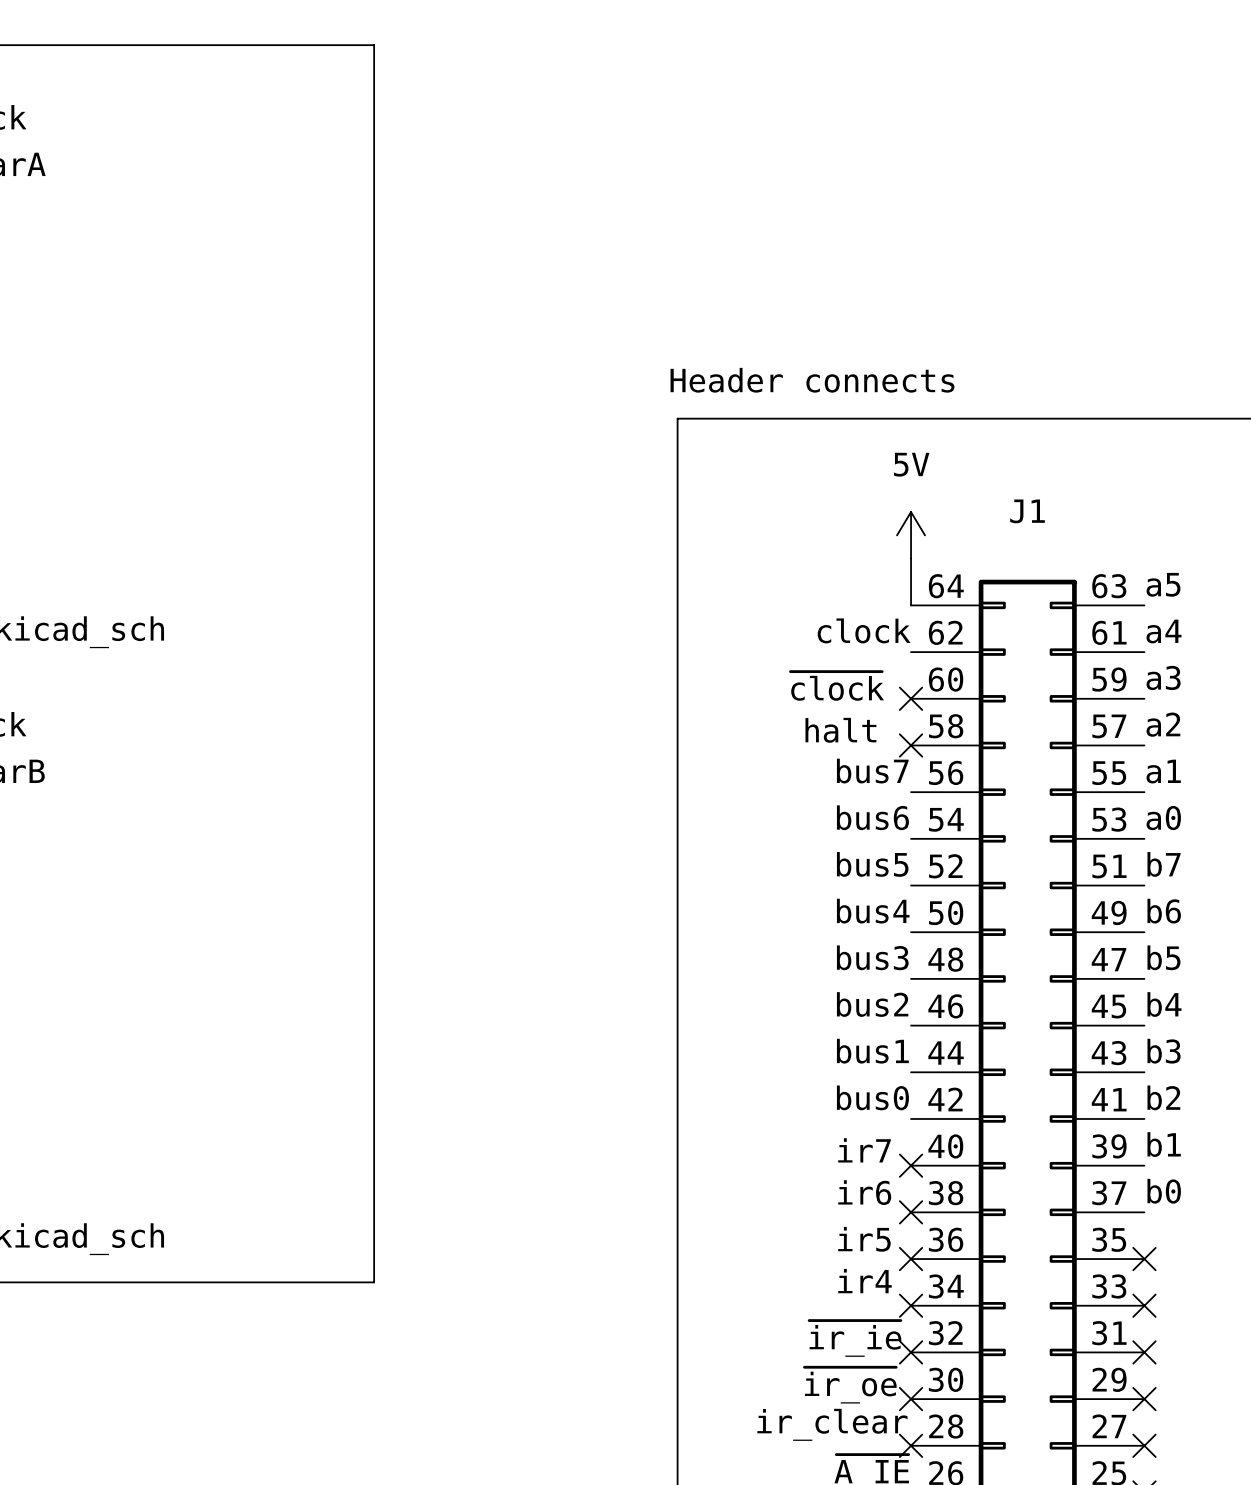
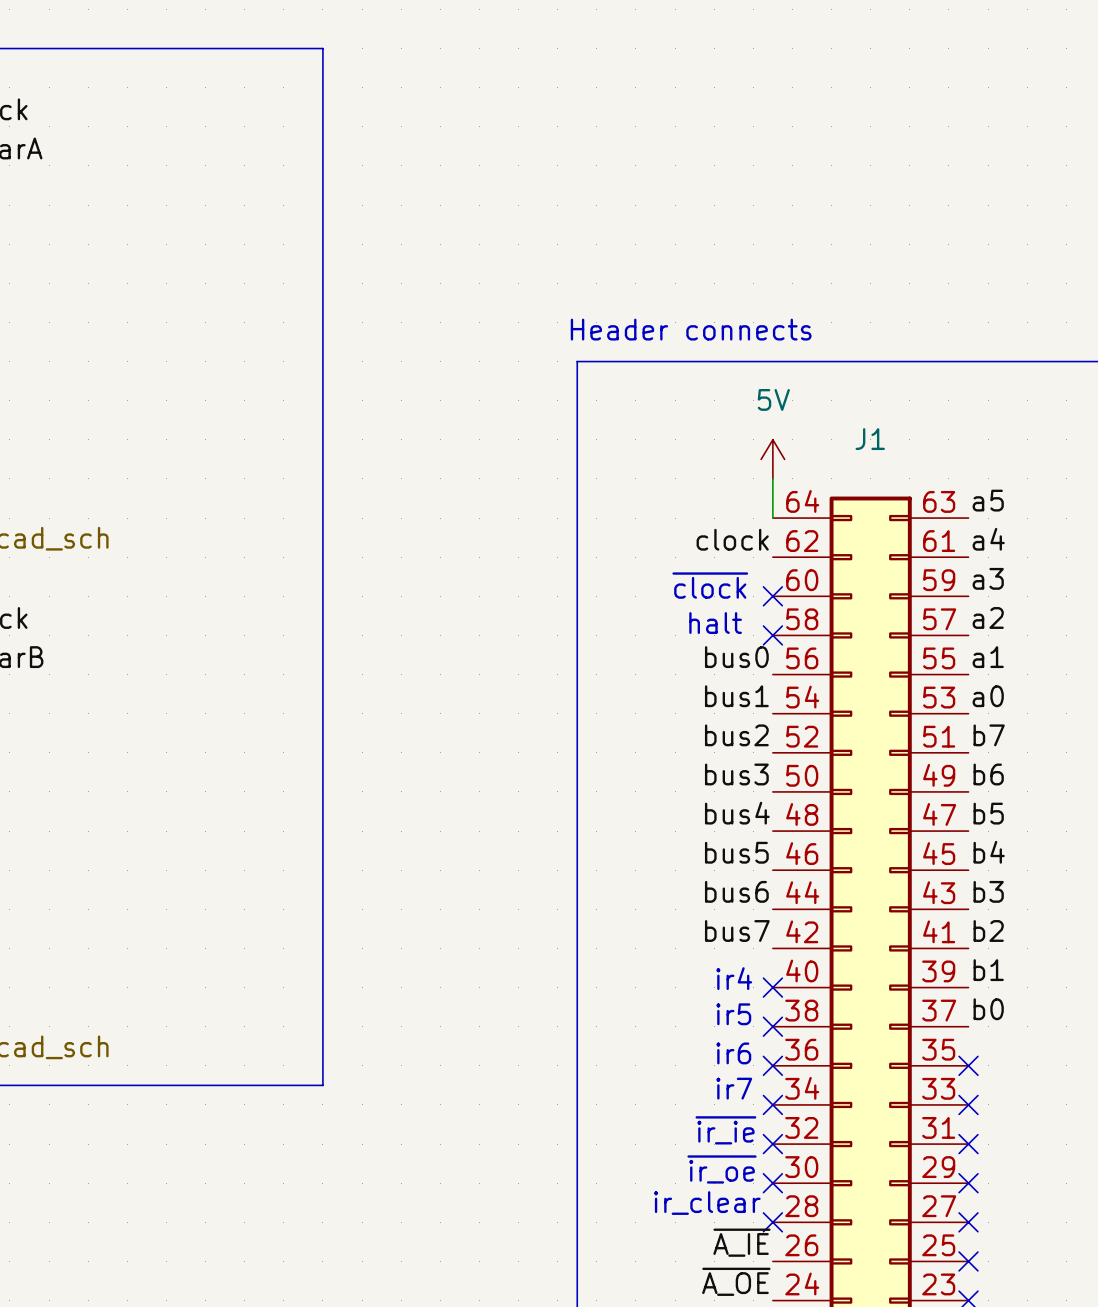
label: bus7 (872, 771) -> bus0 (736, 657)
label: bus6 (872, 817) -> bus1 (736, 696)
label: bus5 (872, 864) -> bus2 (736, 735)
label: bus4 (873, 911) -> bus3 (736, 774)
label: bus3 (872, 957) -> bus4 (737, 813)
label: bus2 (872, 1004) -> bus5 (736, 852)
label: bus1 (872, 1051) -> bus6 (736, 891)
label: bus0 (872, 1097) -> bus7 (737, 930)
text position: ir7 (864, 1150) -> ir7 (734, 1088)
text position: ir6 (864, 1192) -> ir6 (733, 1053)
text position: ir5 (864, 1239) -> ir5 (733, 1014)
text position: ir4 (864, 1281) -> ir4 (734, 978)

